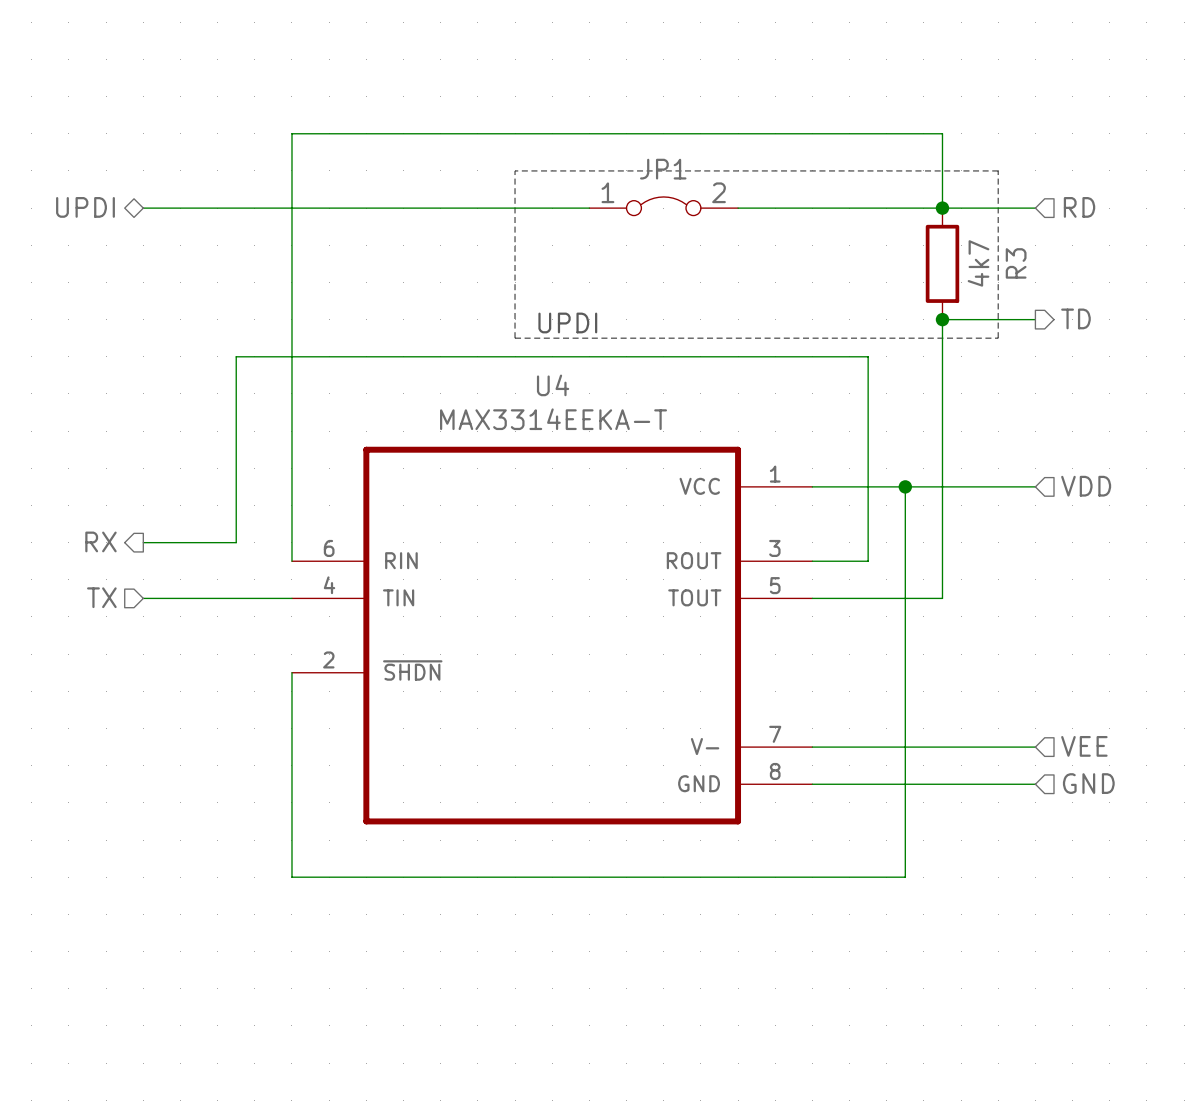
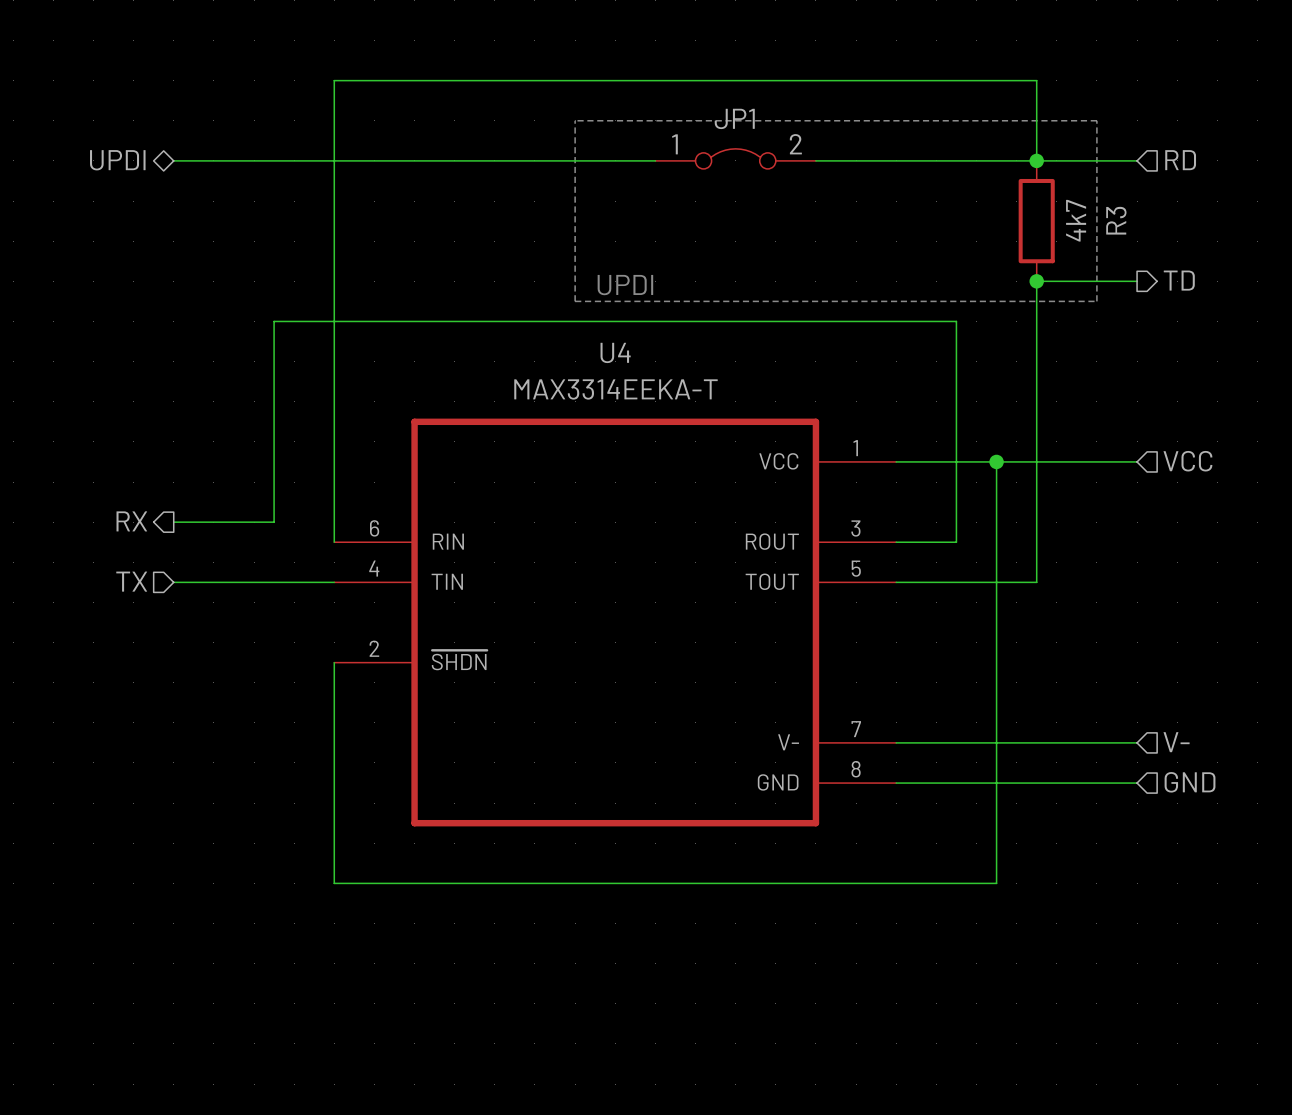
hierarchical label: VDD (1086, 486) -> VCC (1187, 461)
hierarchical label: VEE (1084, 746) -> V- (1176, 742)

